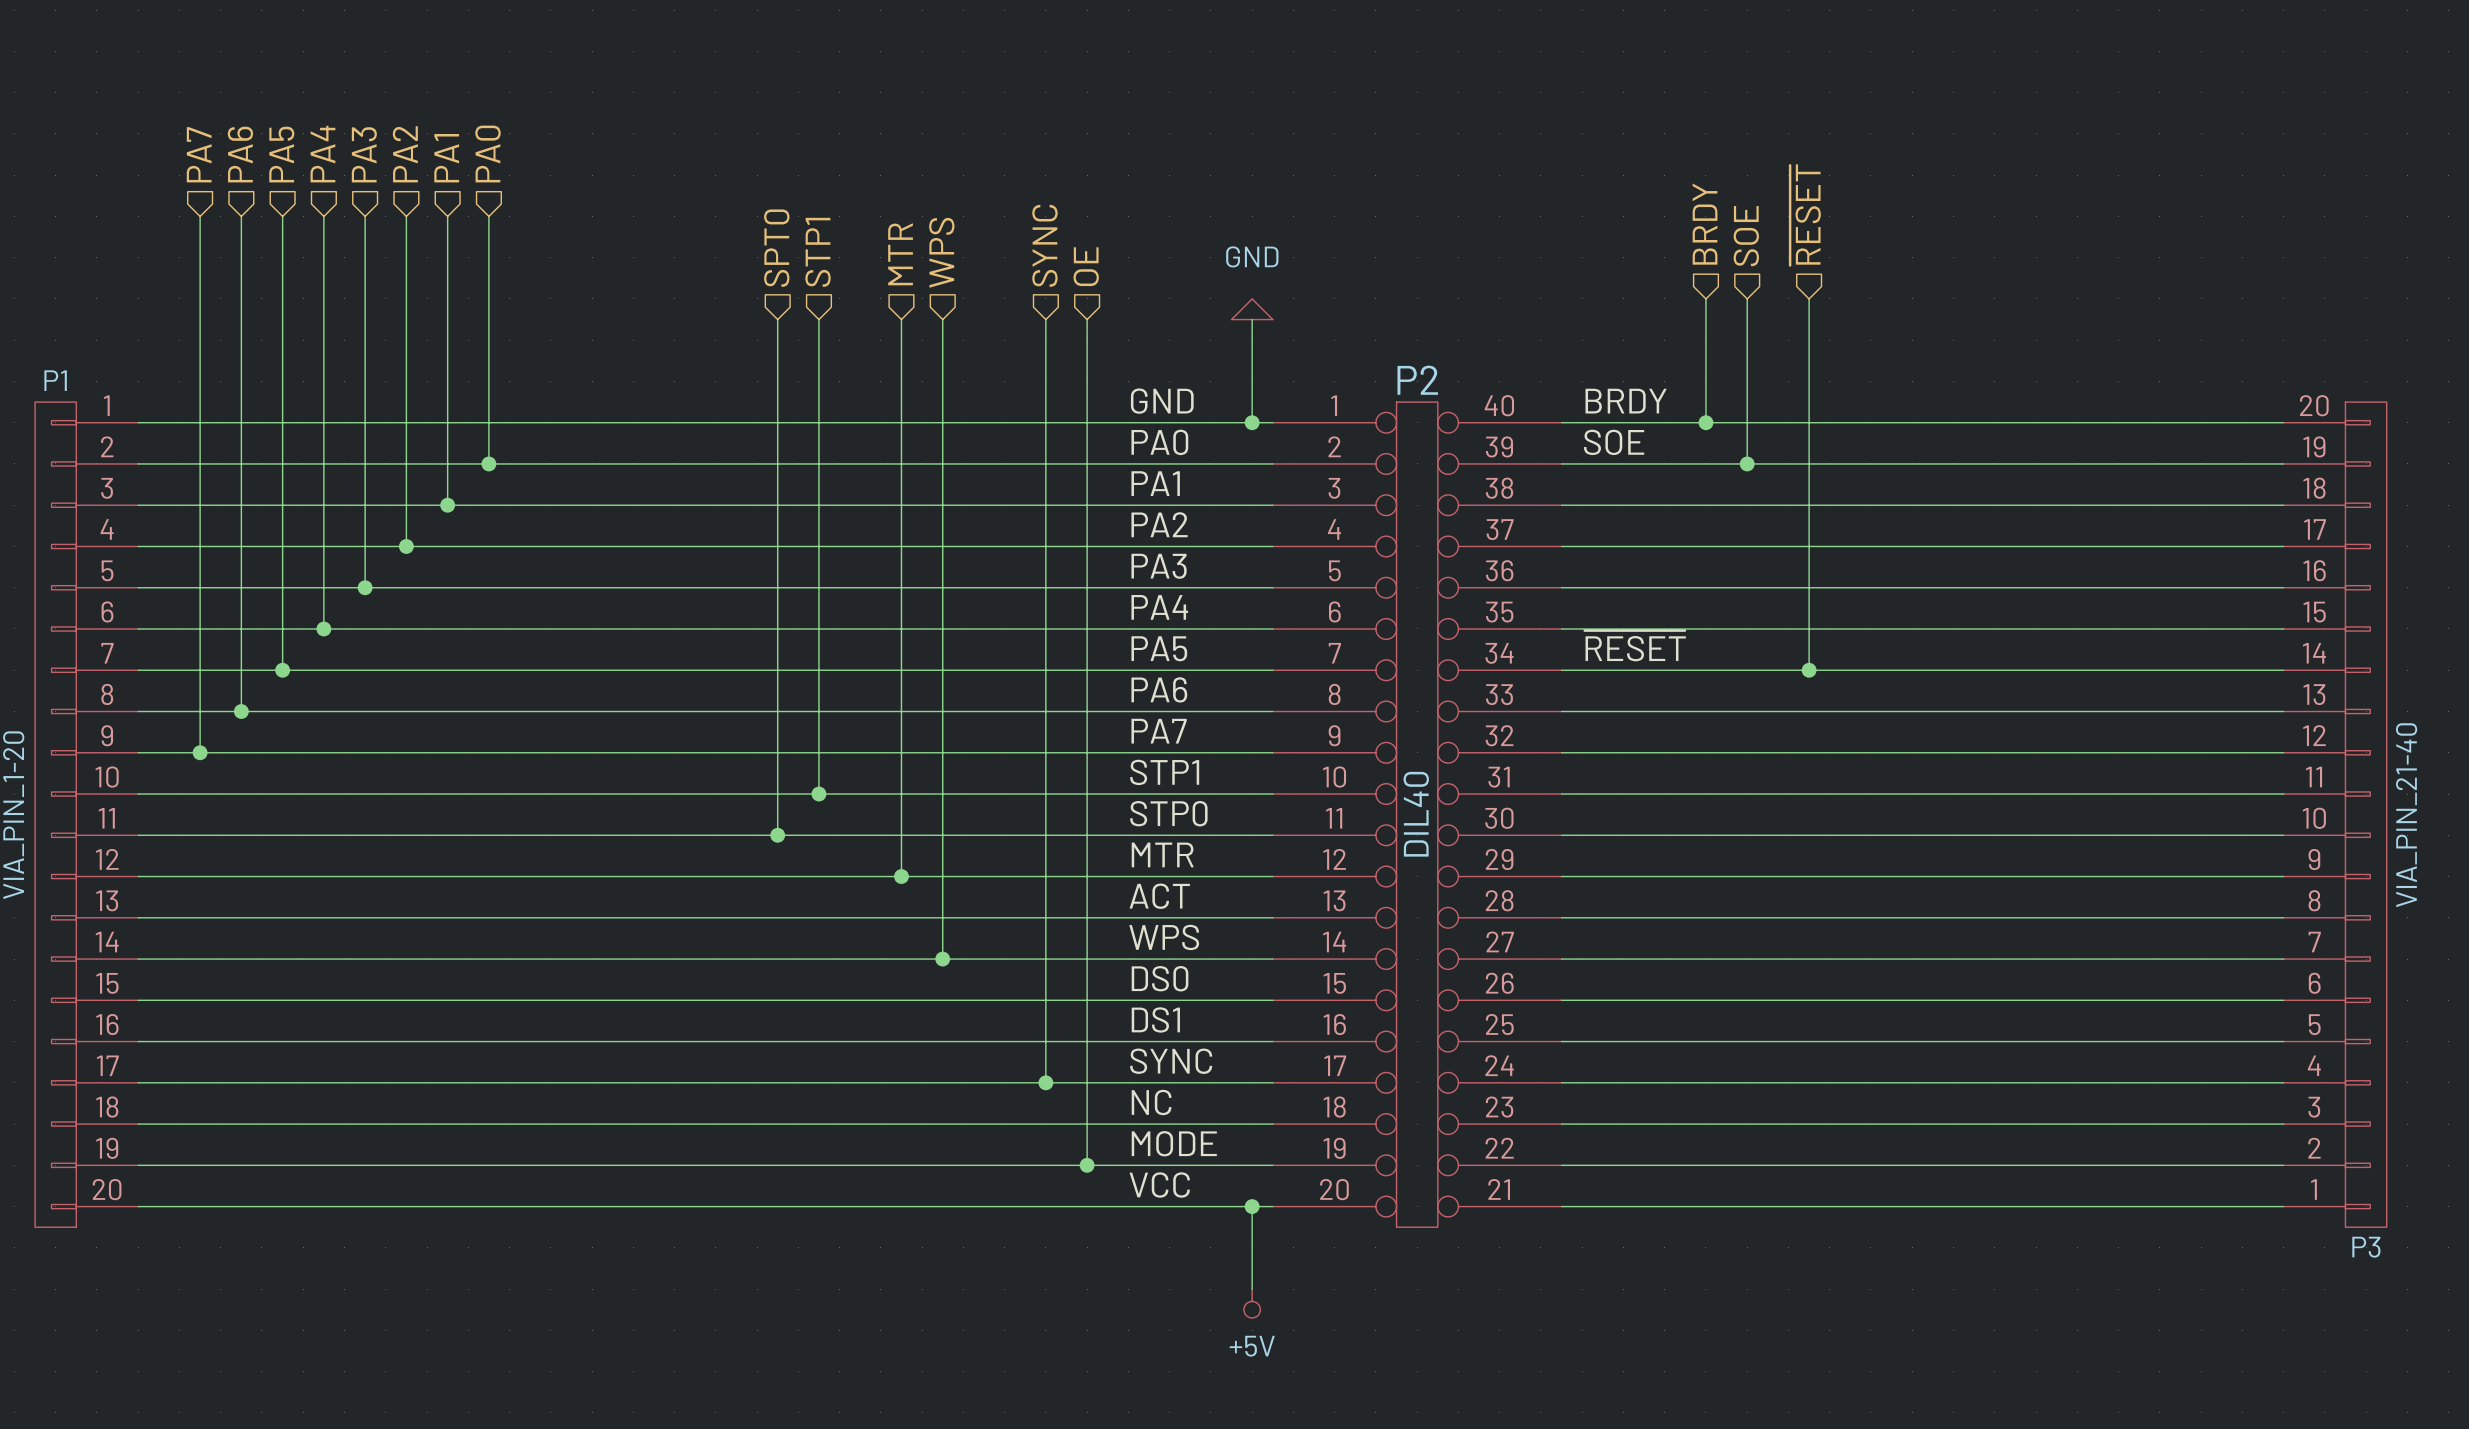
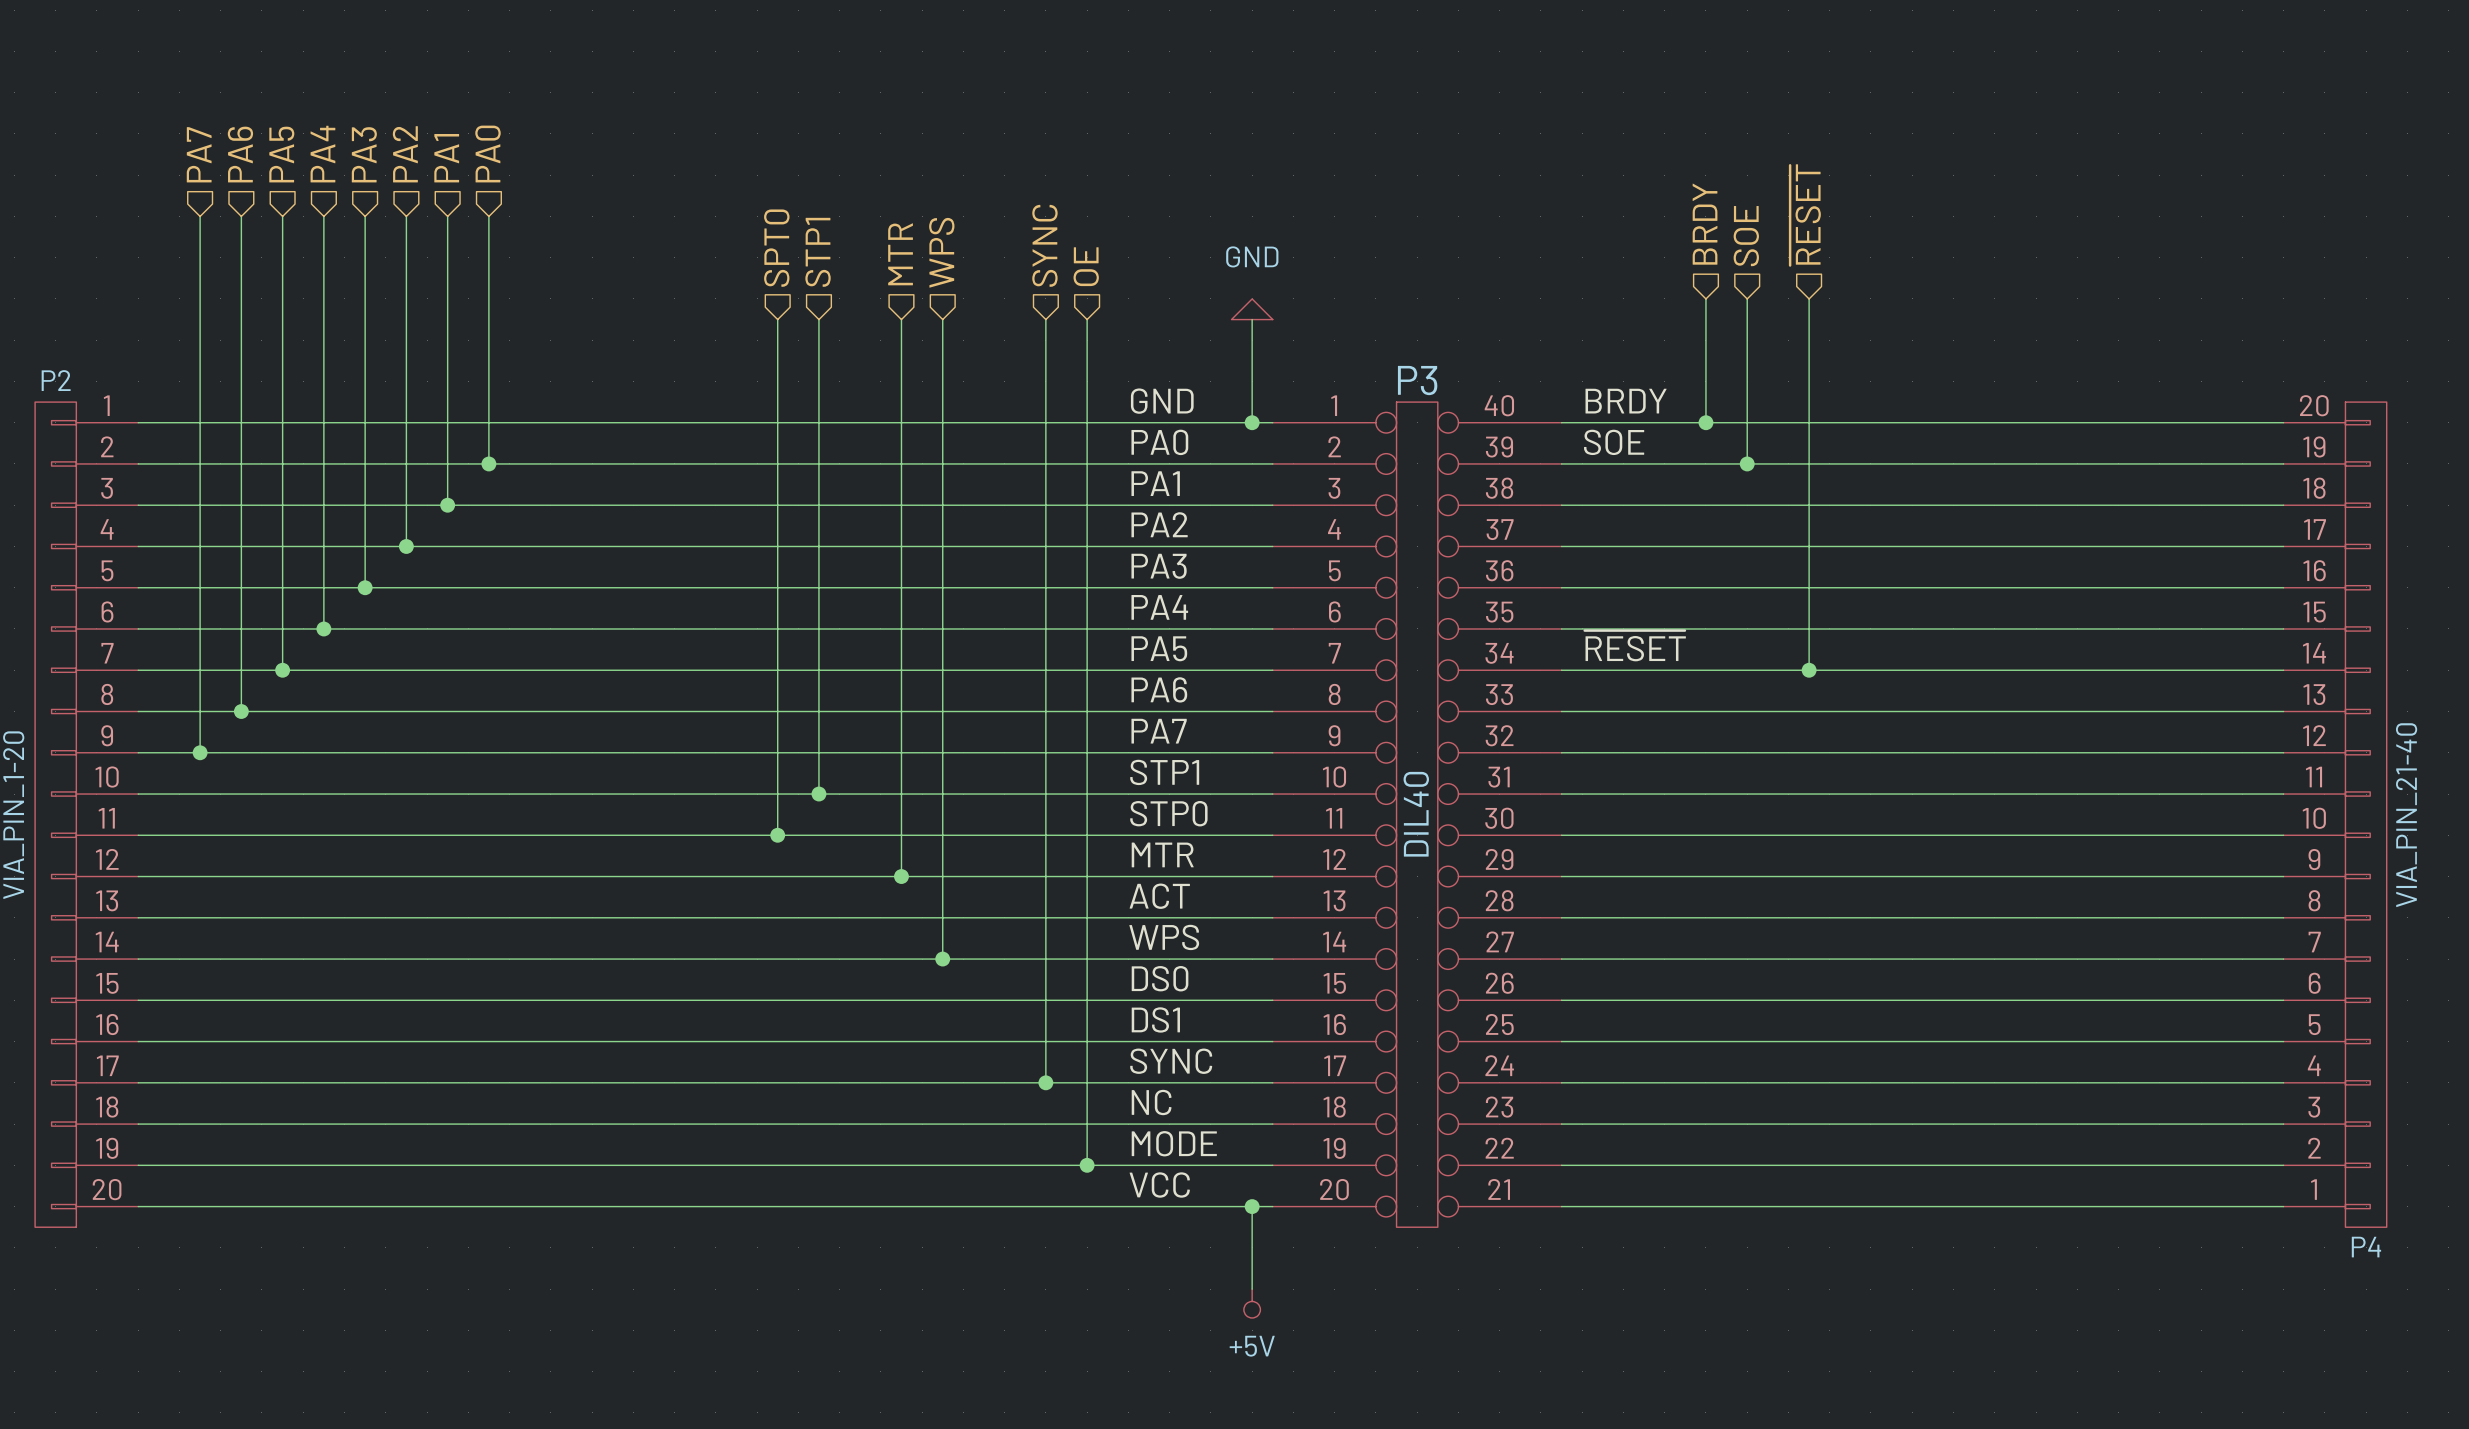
P1 name: P1 (55, 380) -> P2 (56, 380)
P2 name: P2 (1417, 380) -> P3 (1417, 380)
P3 name: P3 (2366, 1247) -> P4 (2366, 1247)

